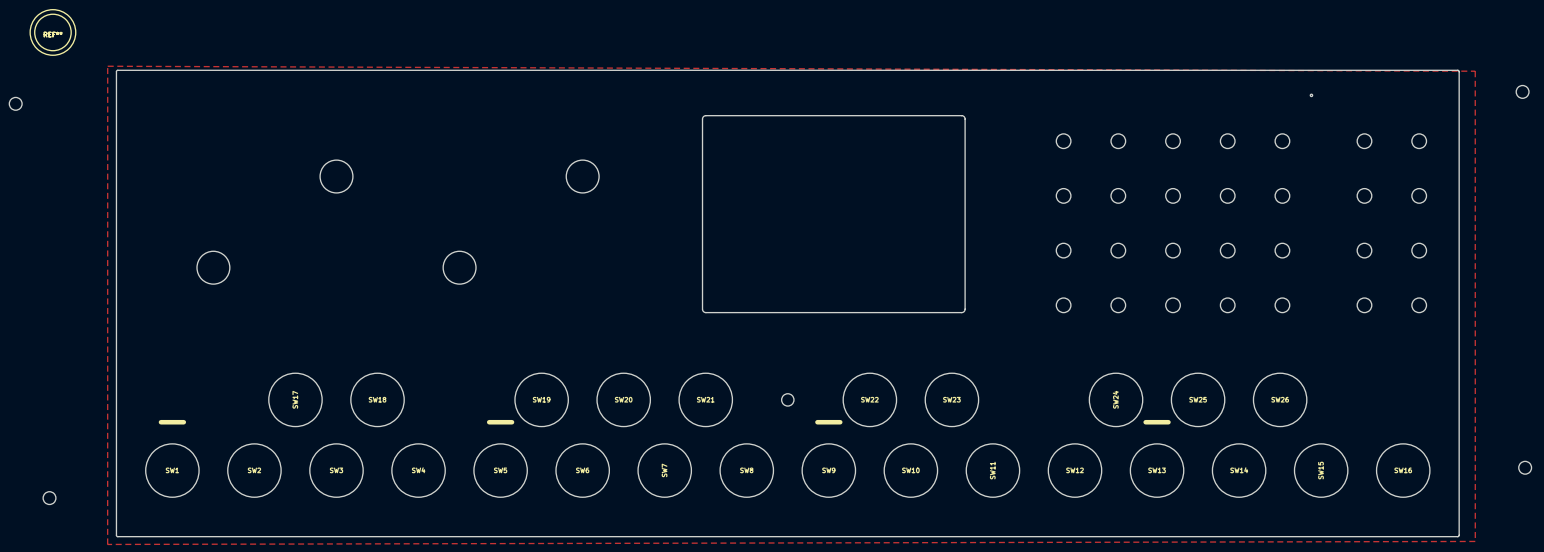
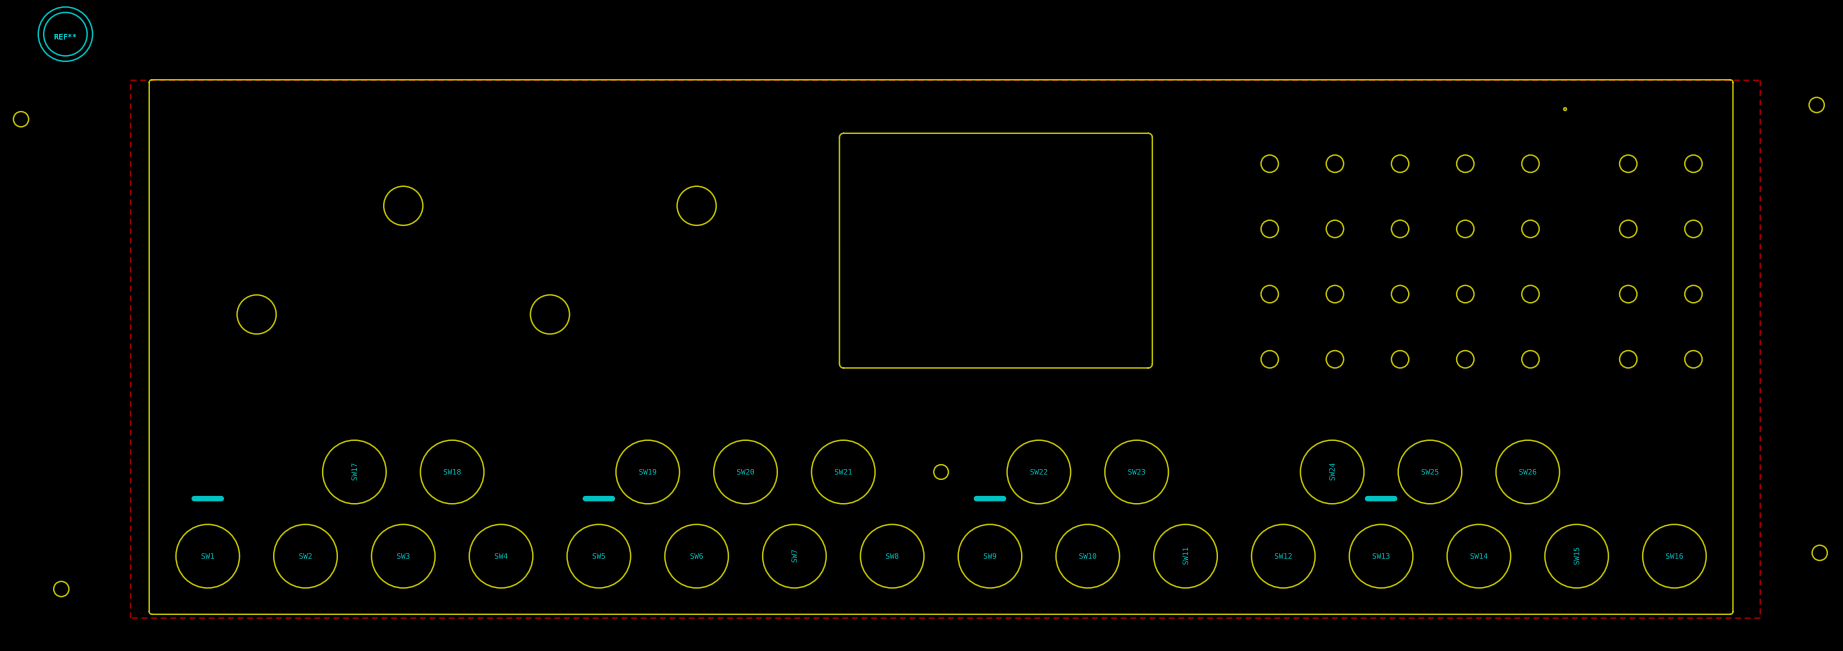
board edge: (117, 70) (1458, 70) (1459, 535) (117, 536) (117, 70) -> (151, 79) (149, 82) (149, 611) (151, 614) (1730, 614) (1732, 612) (1732, 82) (1730, 79) (151, 79)
zone outline: (1475, 71) (107, 66) (107, 544) (1475, 541) (1475, 522) -> (1760, 80) (130, 80) (130, 618) (1760, 618)

